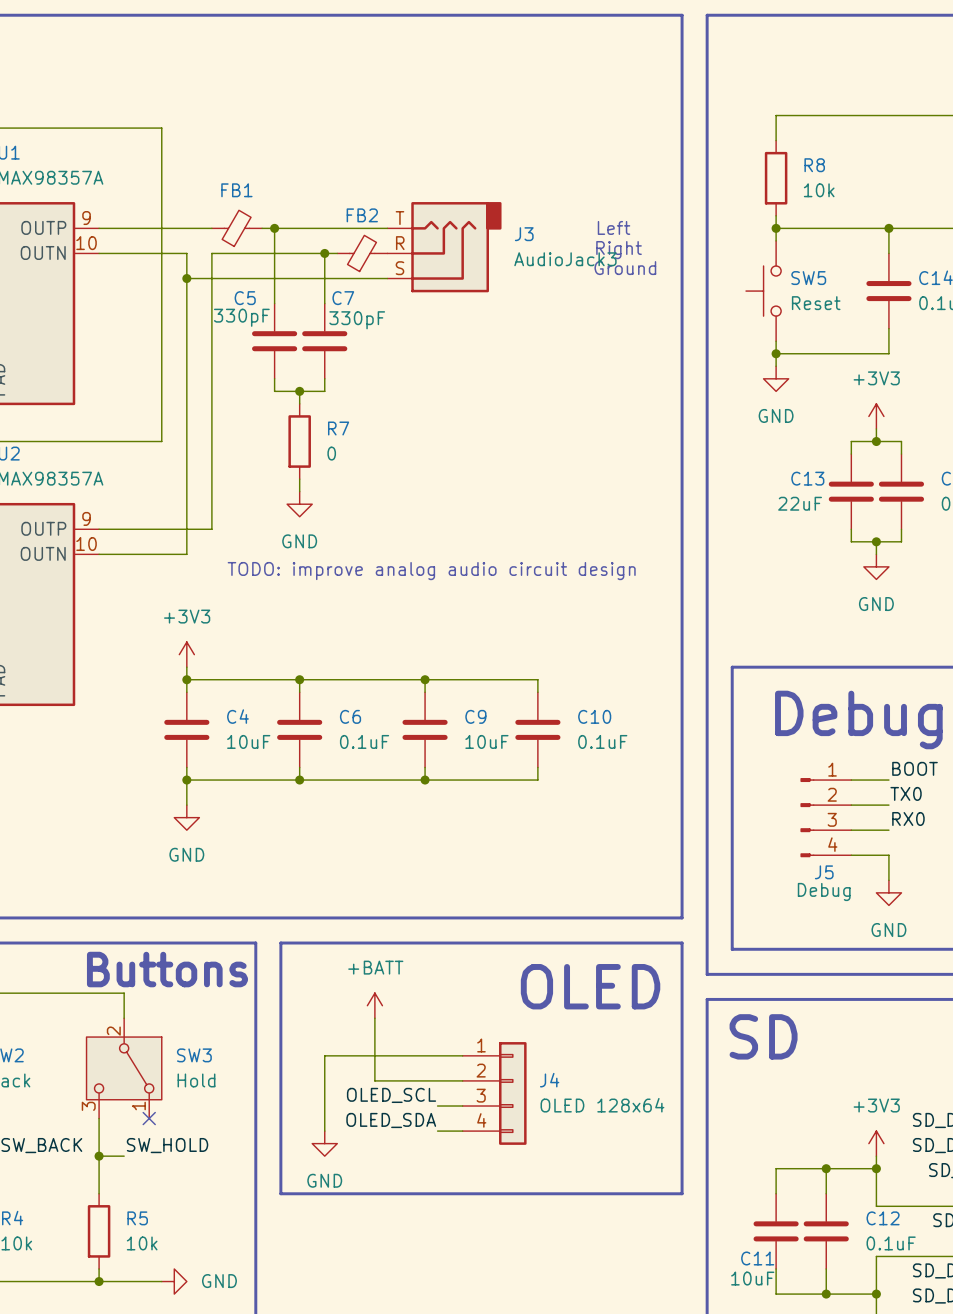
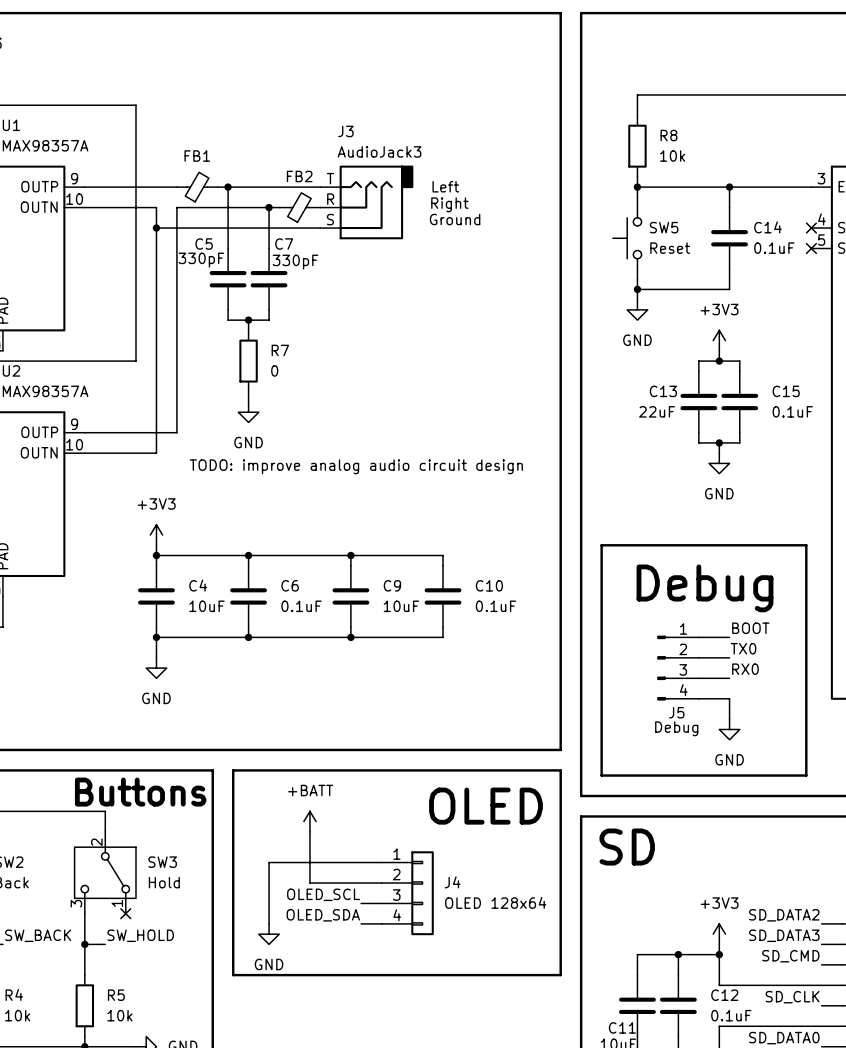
text position: Left (614, 227) -> Left (445, 186)
J3 name position: J3 (524, 234) -> J3 (345, 131)
text position: Right (619, 250) -> Right (449, 204)
J3 value position: AudioJack3 (565, 259) -> AudioJack3 (379, 151)
text position: Ground (625, 268) -> Ground (455, 219)

